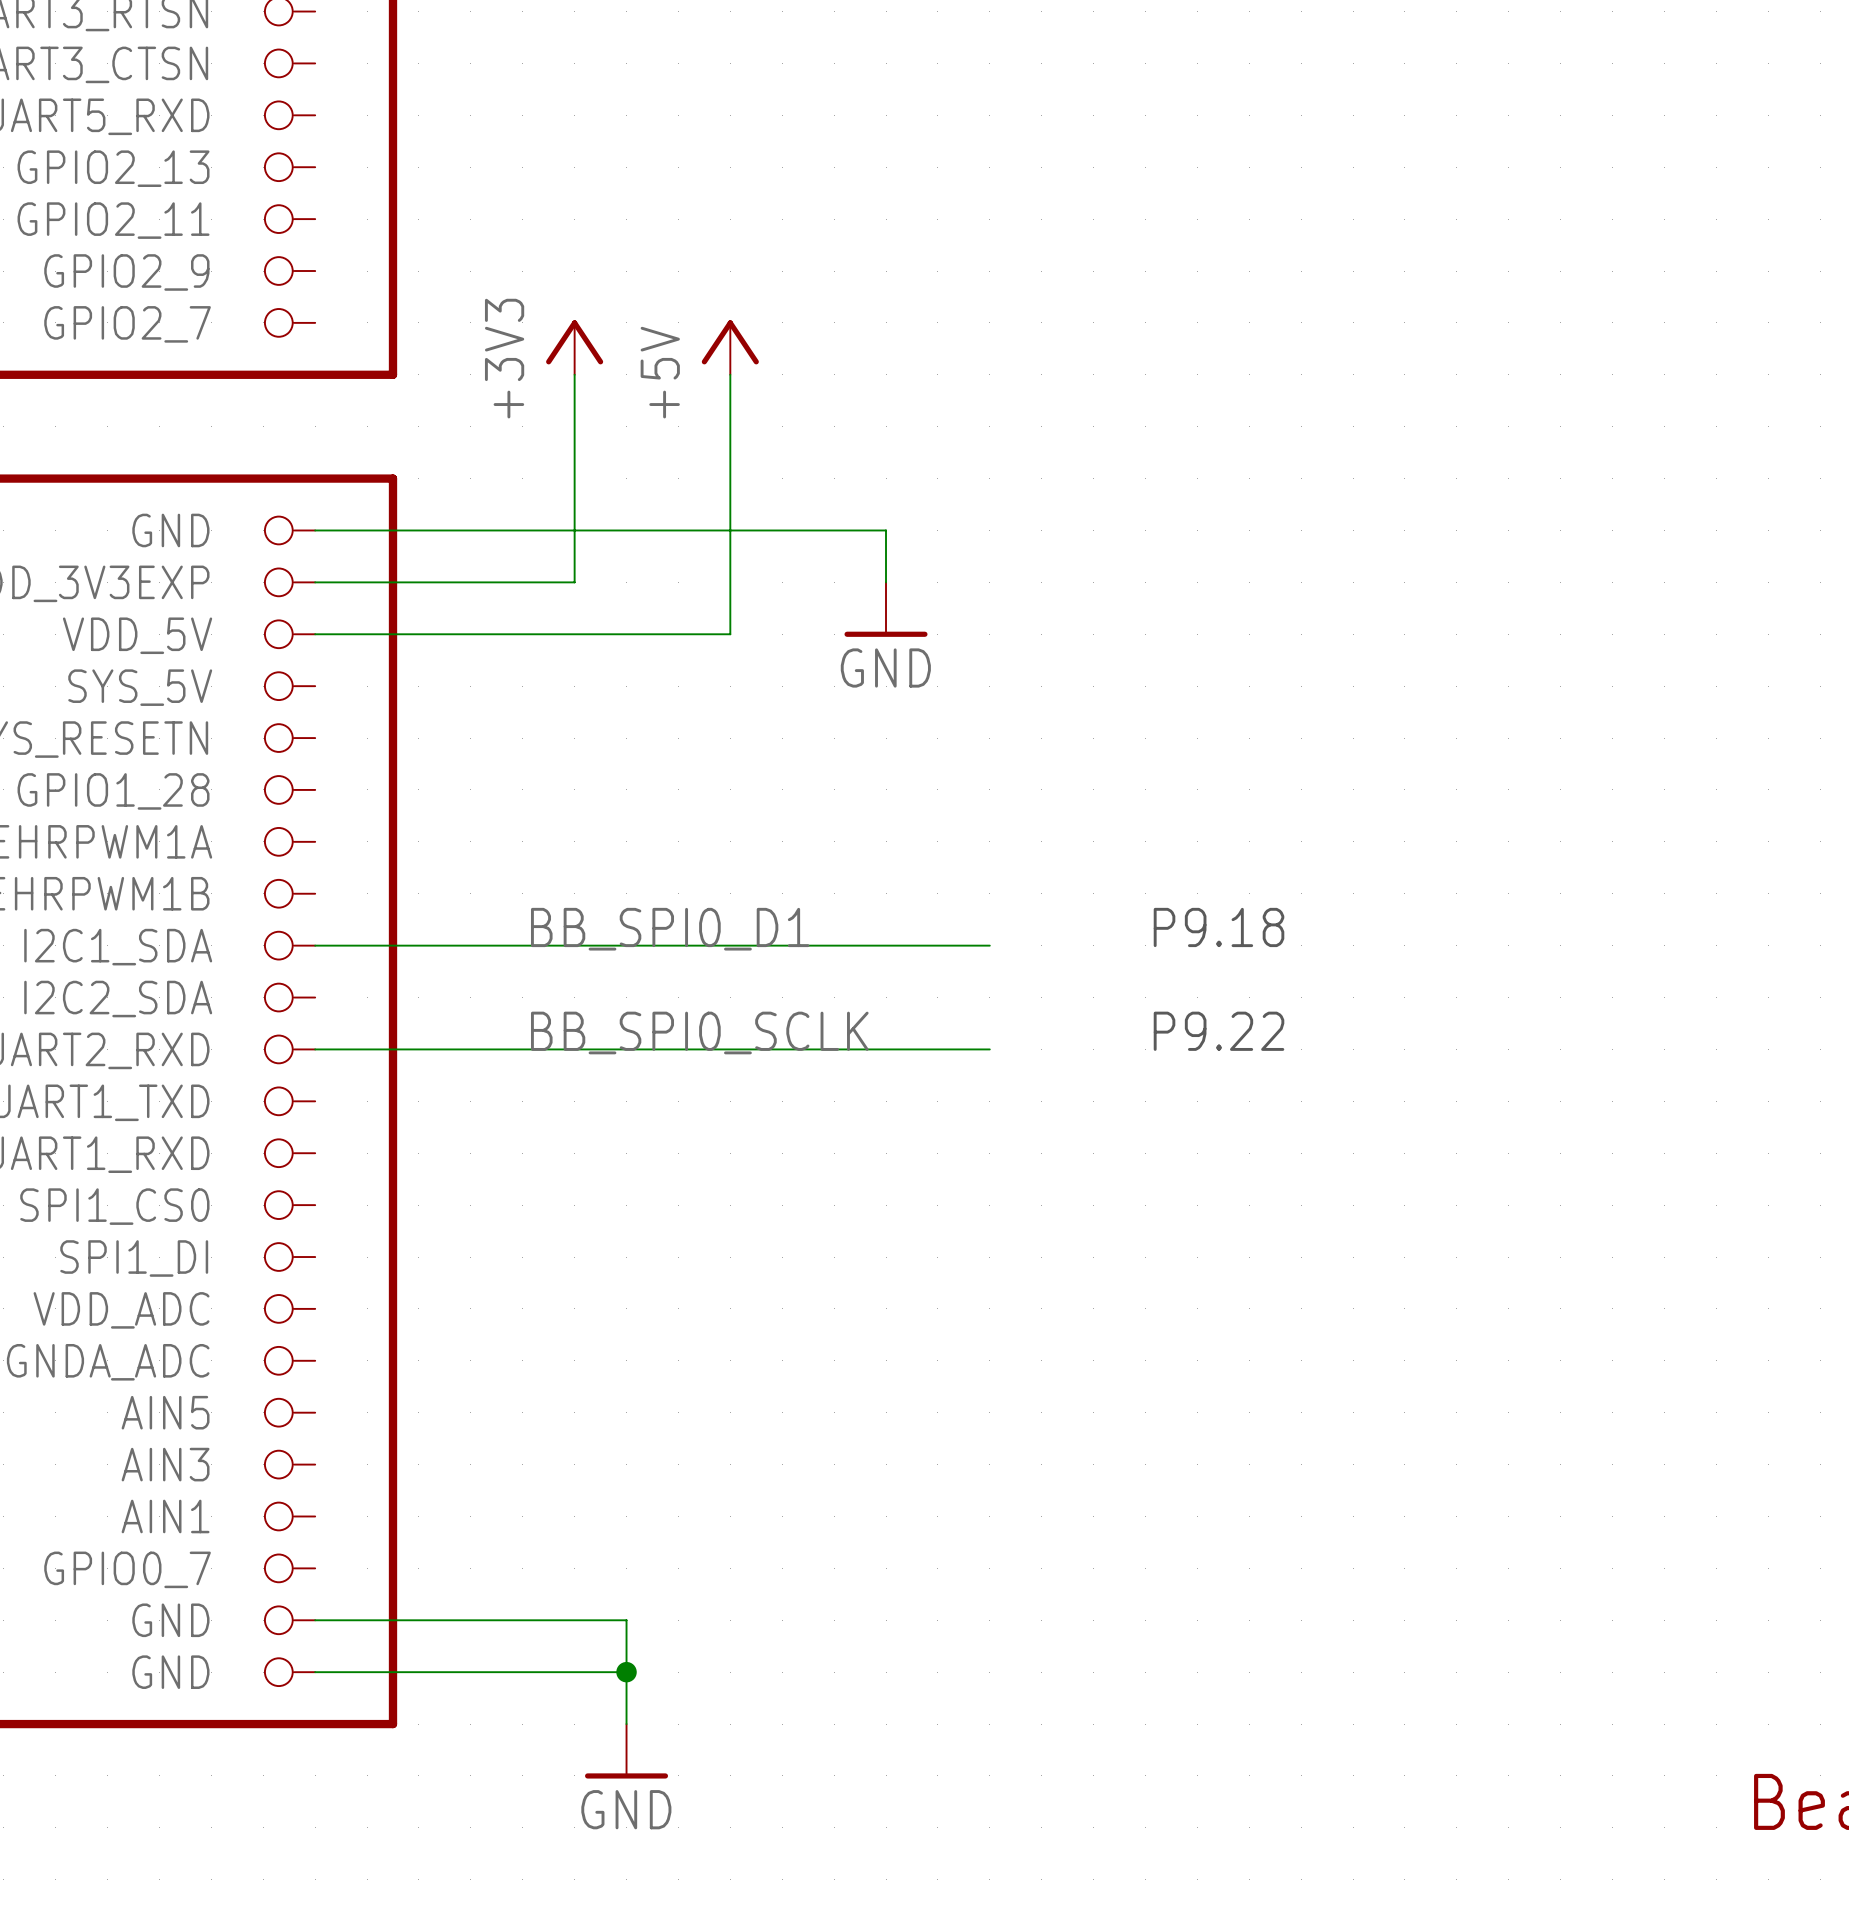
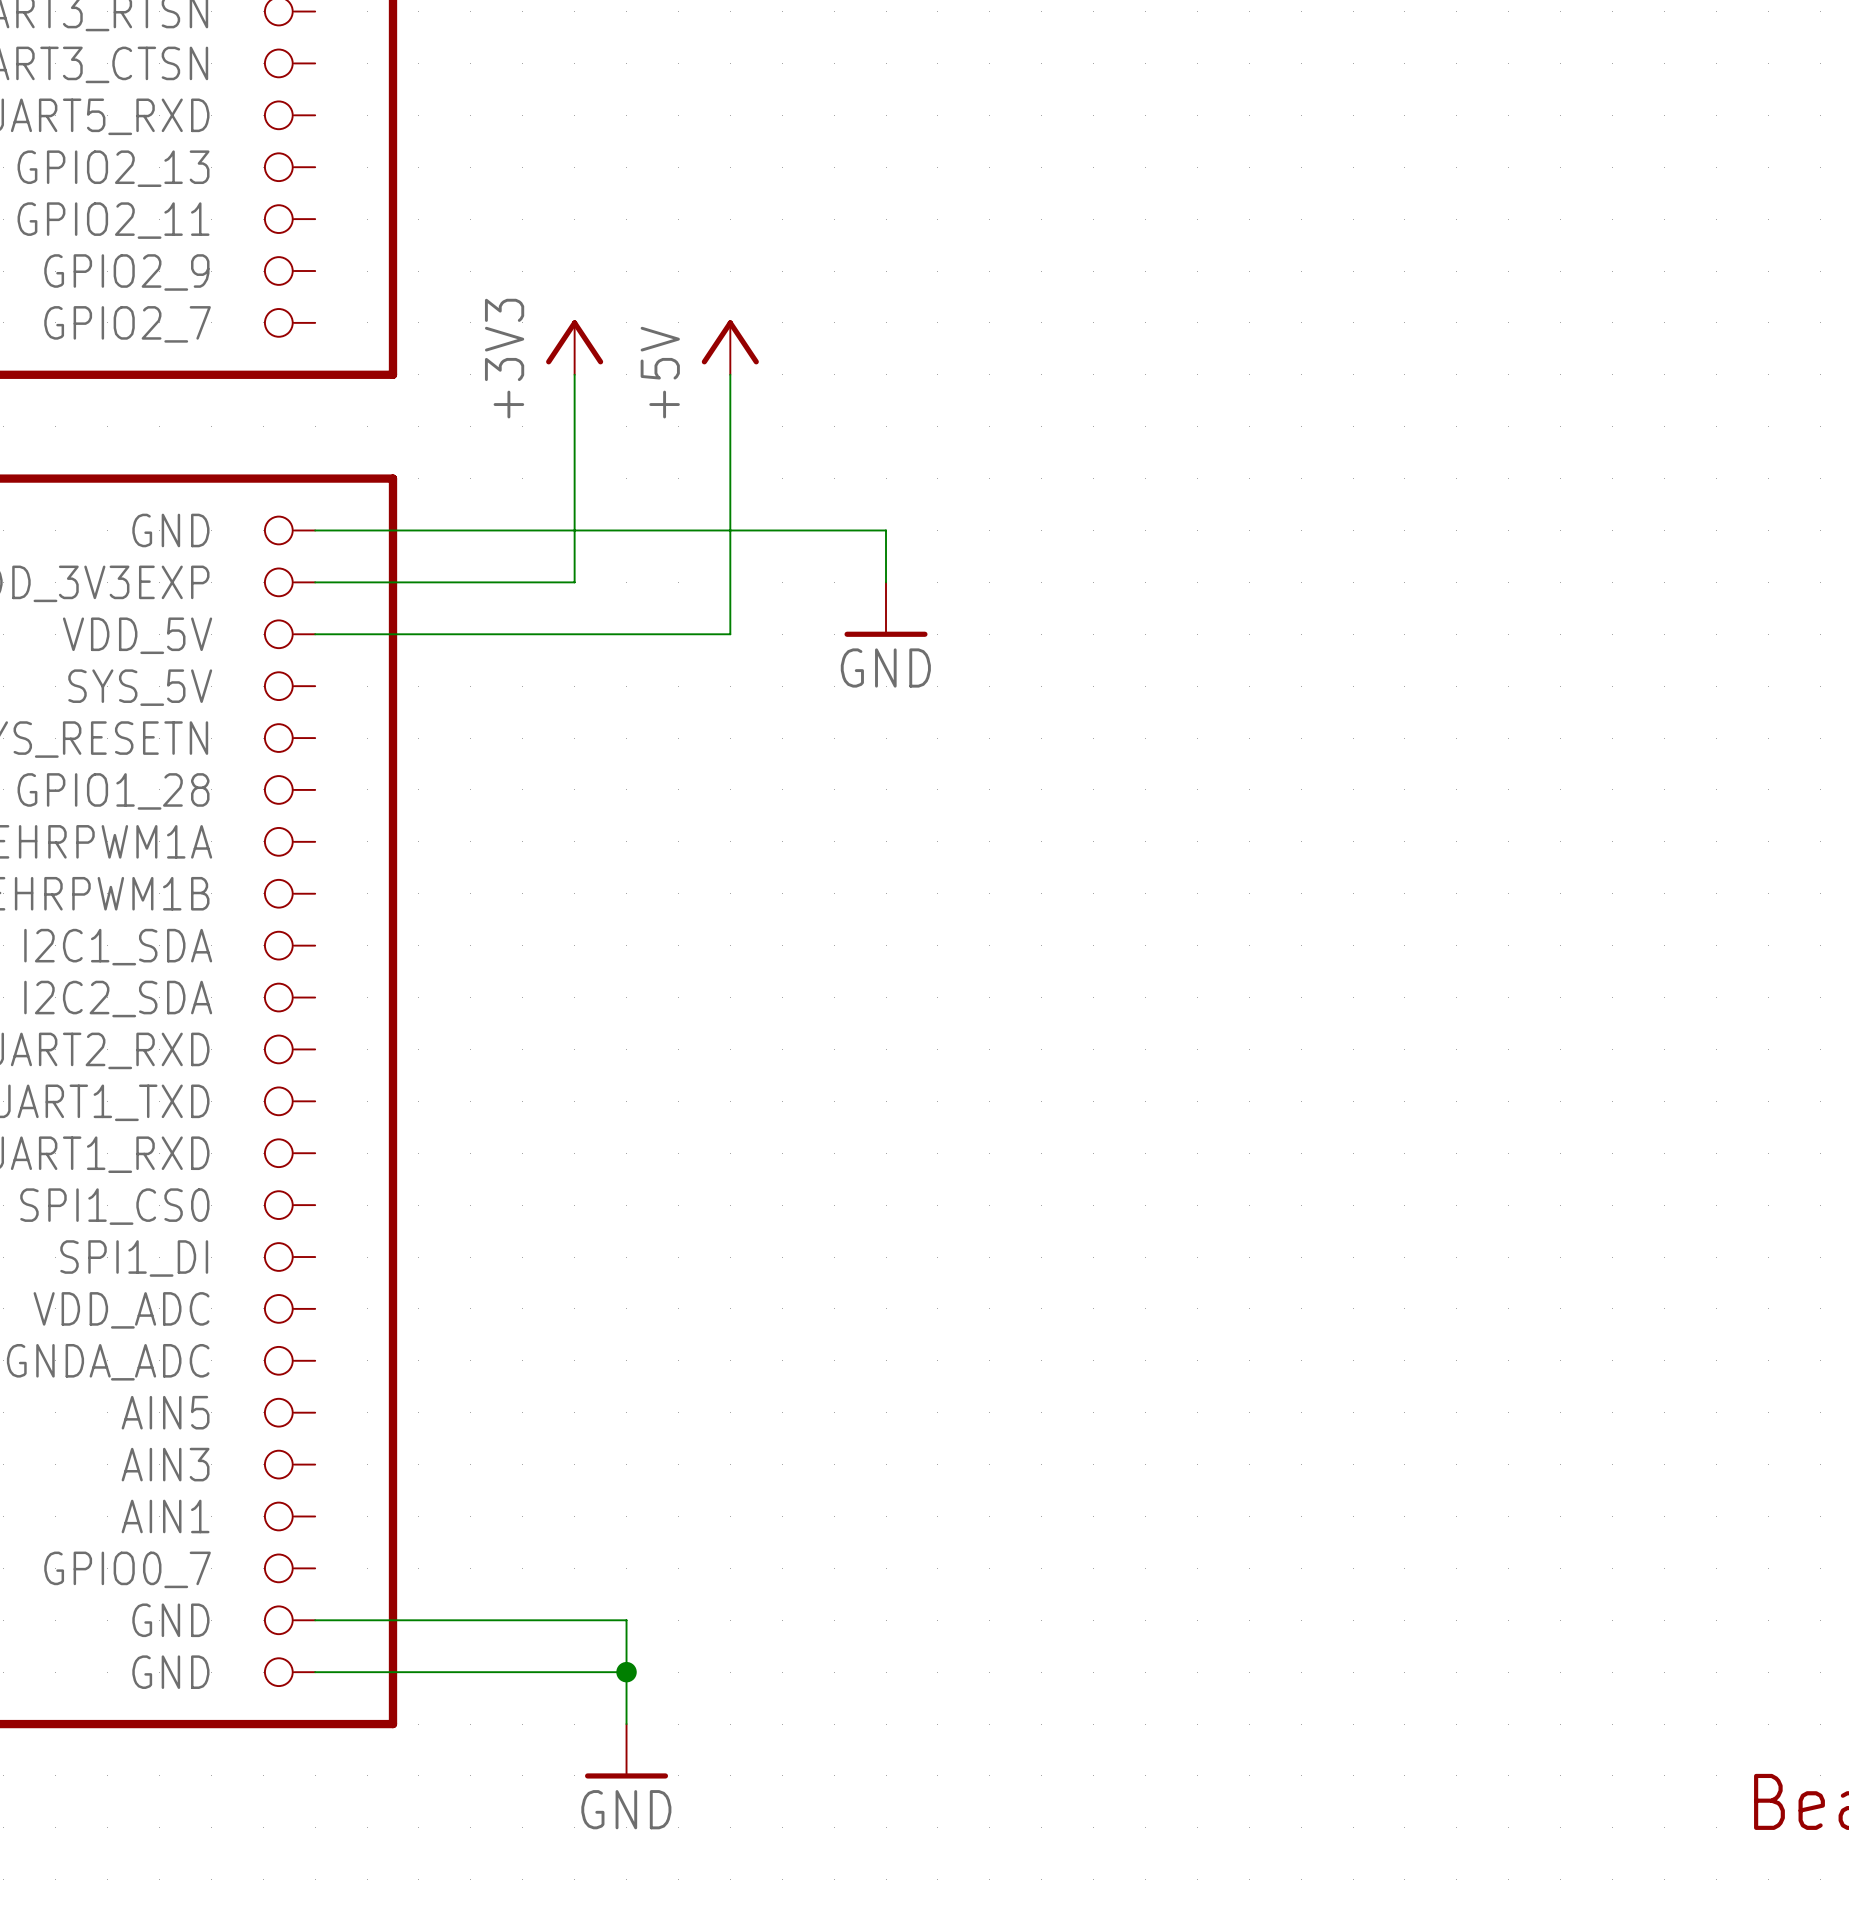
text: P9.18 (1219, 927) -> none
label: BB_SPI0_D1 (670, 929) -> none
wire: (315, 945) (989, 945) -> none
text: P9.22 (1219, 1031) -> none
label: BB_SPI0_SCLK (699, 1032) -> none
wire: (315, 1049) (989, 1049) -> none

